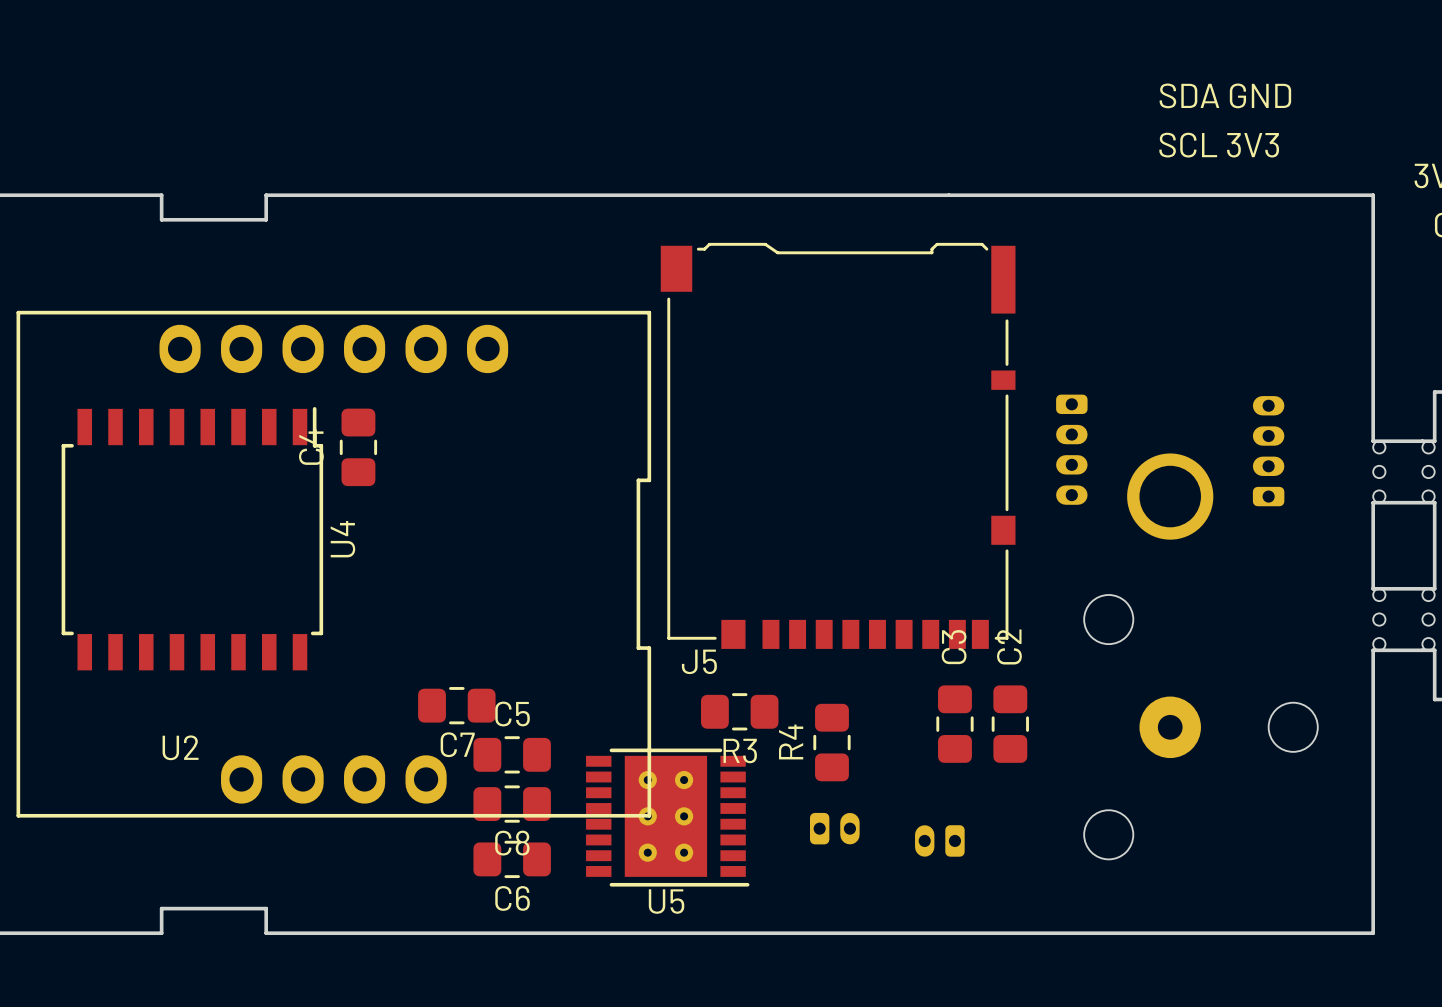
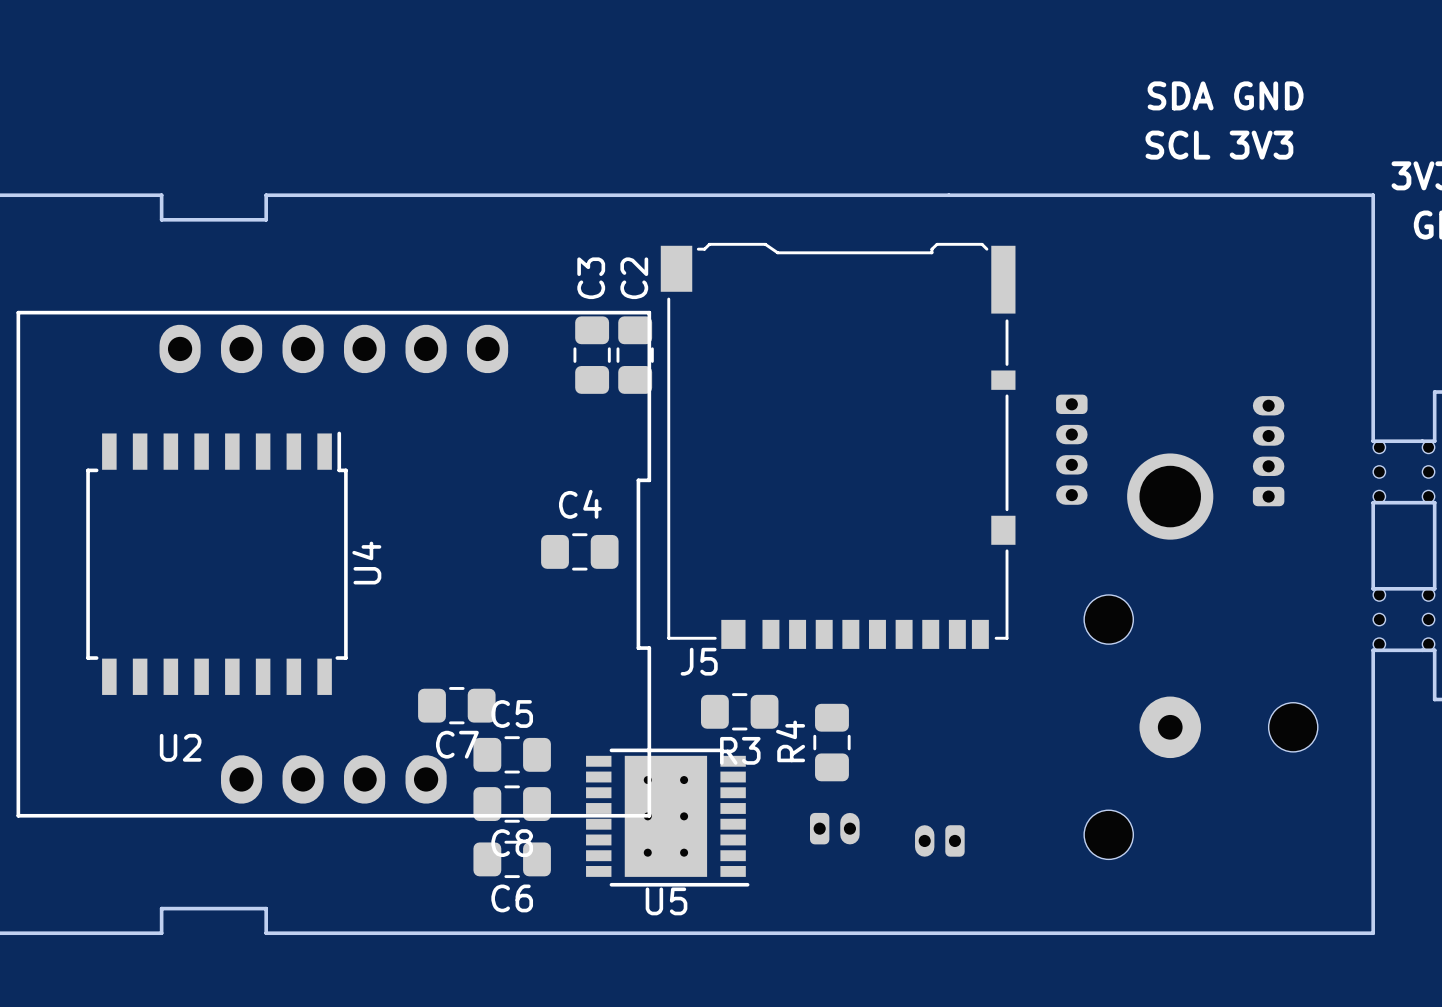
C4 rotation: 0° (358, 447) -> 90° clockwise (579, 551)
C4 position: (358, 447) -> (579, 551)
U4 position: (192, 538) -> (216, 563)
C3 position: (954, 724) -> (592, 355)
C2 position: (1010, 724) -> (635, 355)

